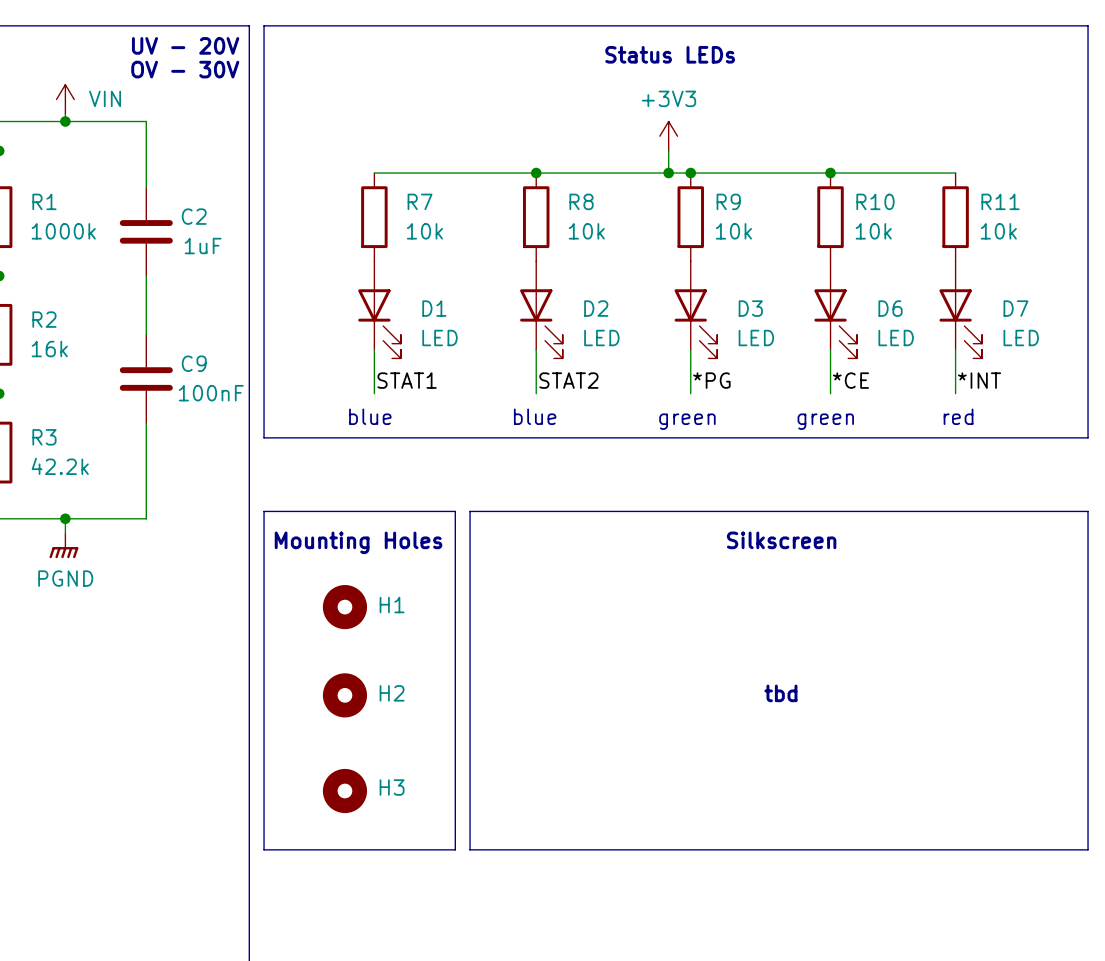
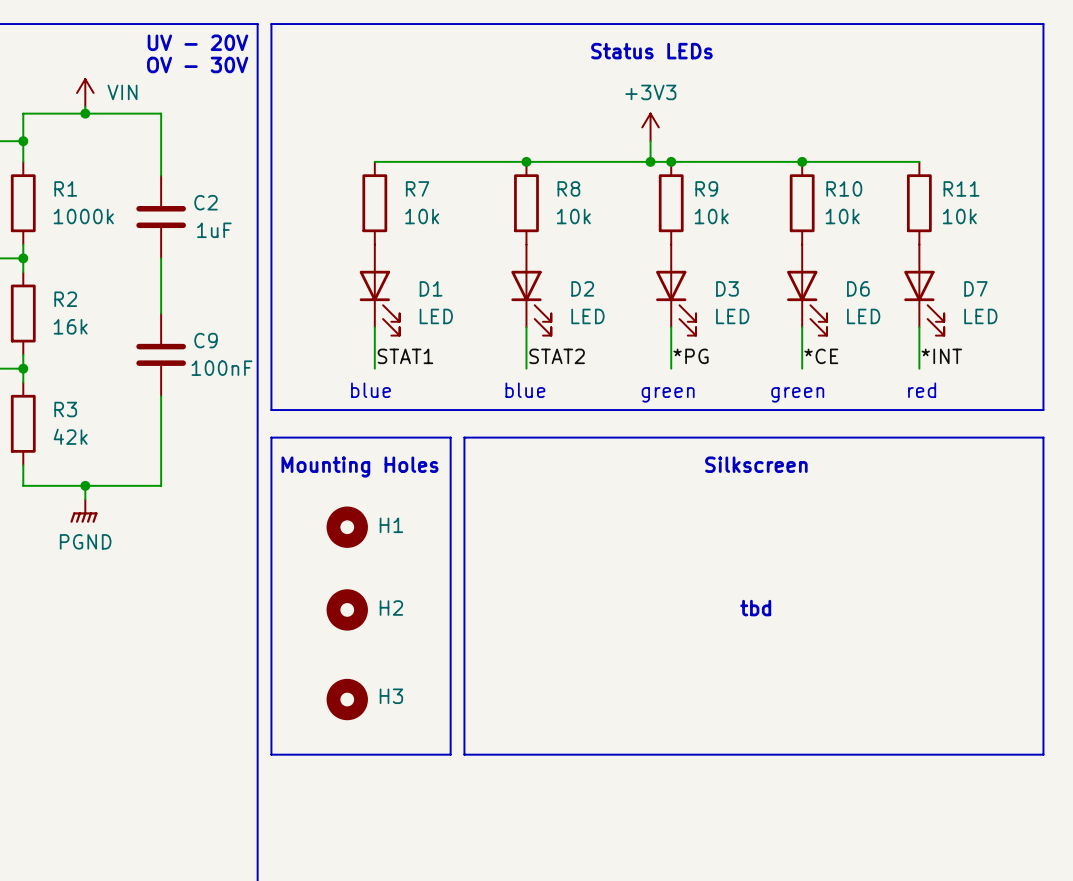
R3 value: 42.2k (60, 466) -> 42k (70, 436)
line: (264, 511) (455, 511) -> (271, 478) (271, 437) (450, 437) (450, 478)
line: (470, 511) (1088, 511) -> (464, 478) (464, 437) (1043, 437) (1043, 478)
text position: Silkscreen (781, 540) -> Silkscreen (756, 464)
text position: Mounting Holes (358, 542) -> Mounting Holes (359, 467)
H1 position: (344, 607) -> (347, 527)
text position: tbd (780, 693) -> tbd (755, 608)
H2 position: (344, 695) -> (347, 609)
H3 position: (344, 791) -> (347, 699)
line: (264, 805) (264, 849) (455, 849) (455, 805) -> (271, 754) (450, 754)
line: (470, 805) (470, 849) (1088, 849) (1088, 805) -> (464, 754) (1043, 754)

